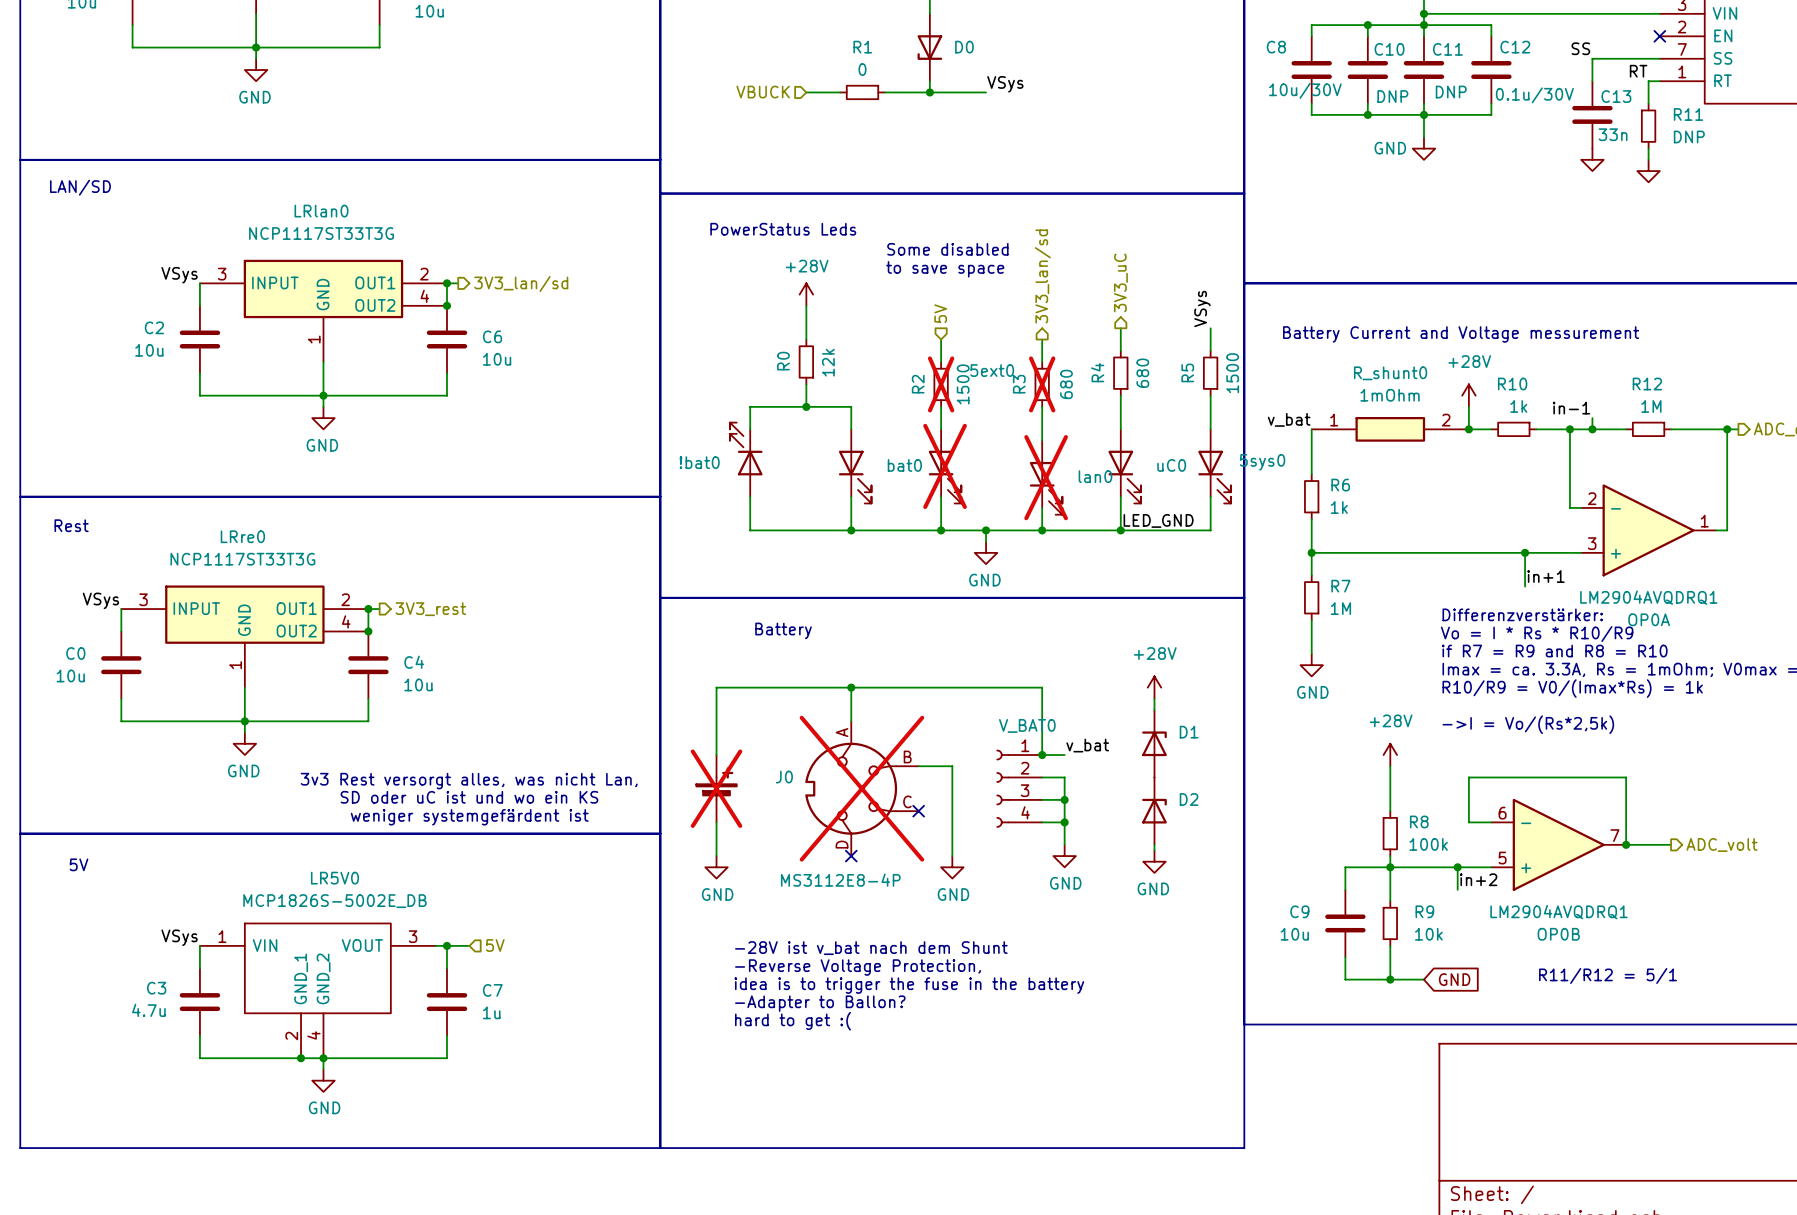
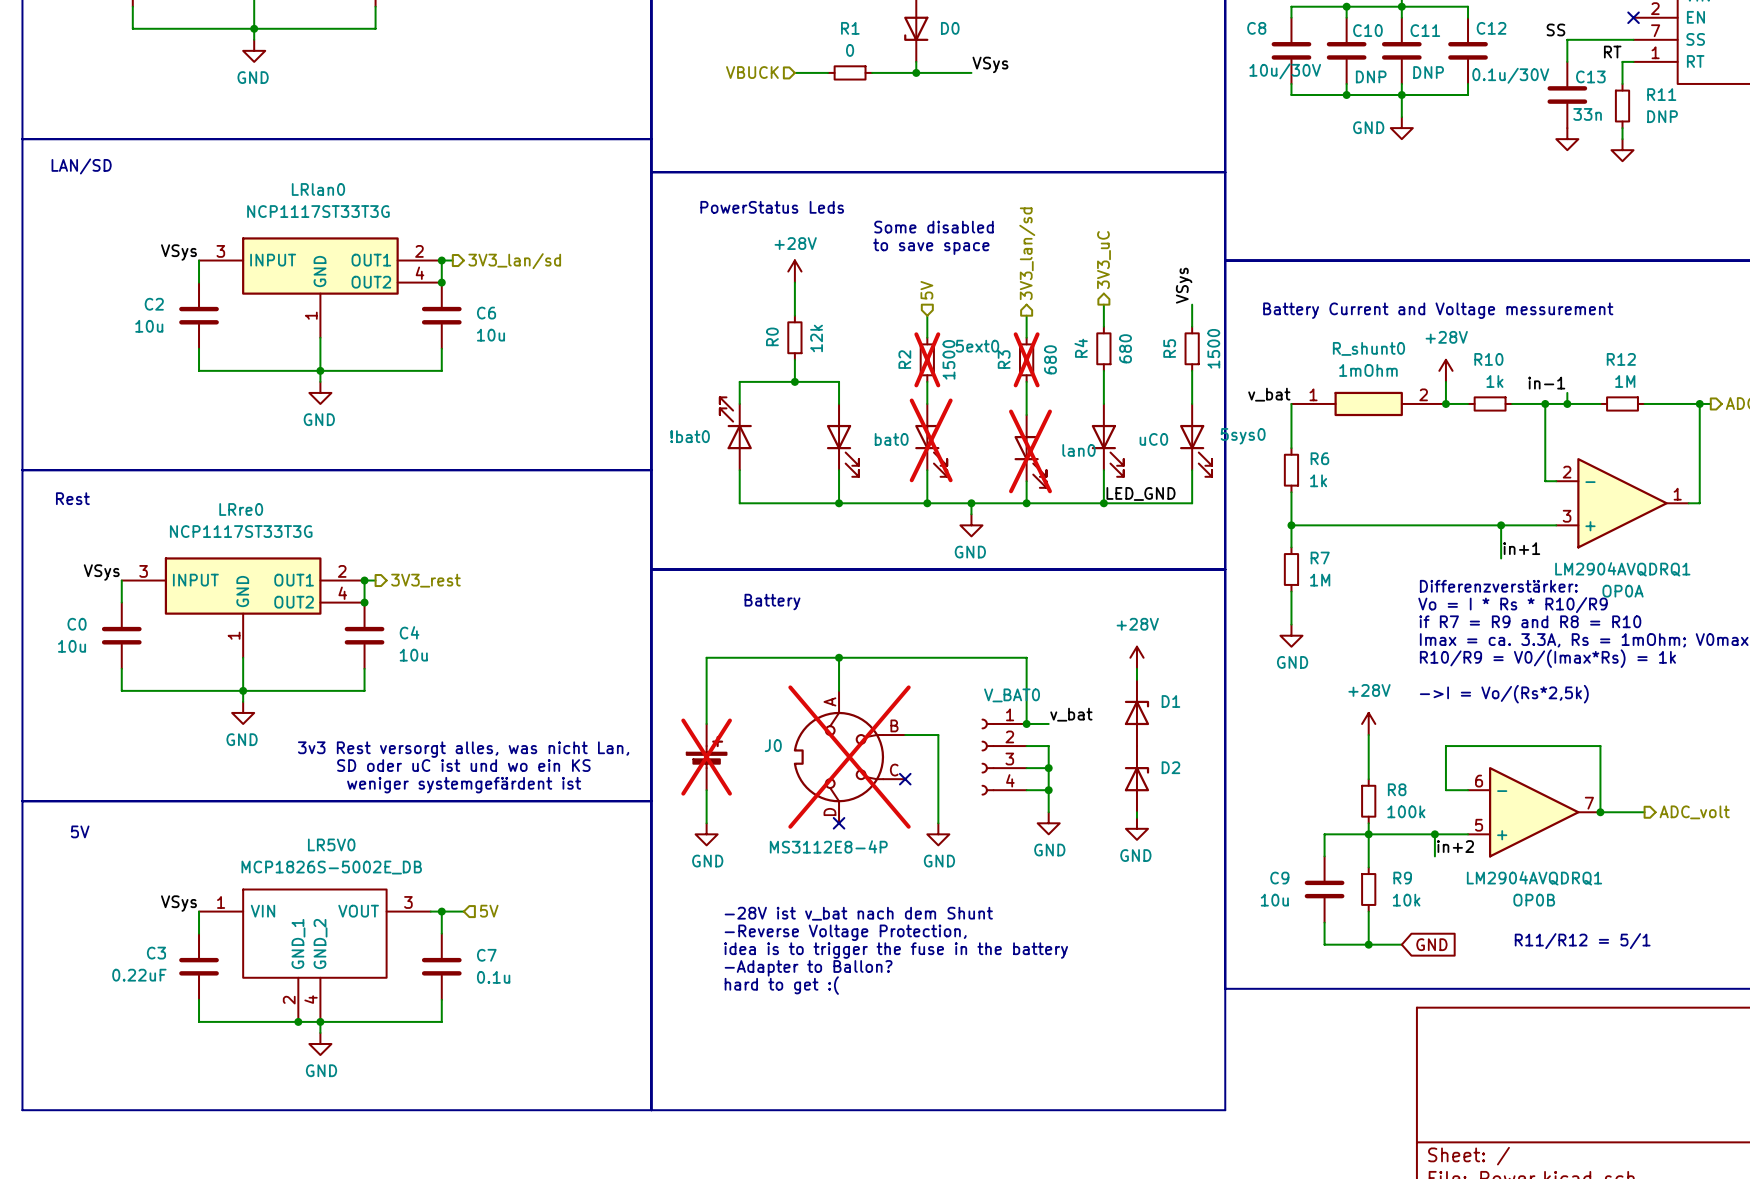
C3 value: 4.7u (148, 1010) -> 0.22uF (139, 975)
C7 value: 1u (491, 1012) -> 0.1u (493, 977)

